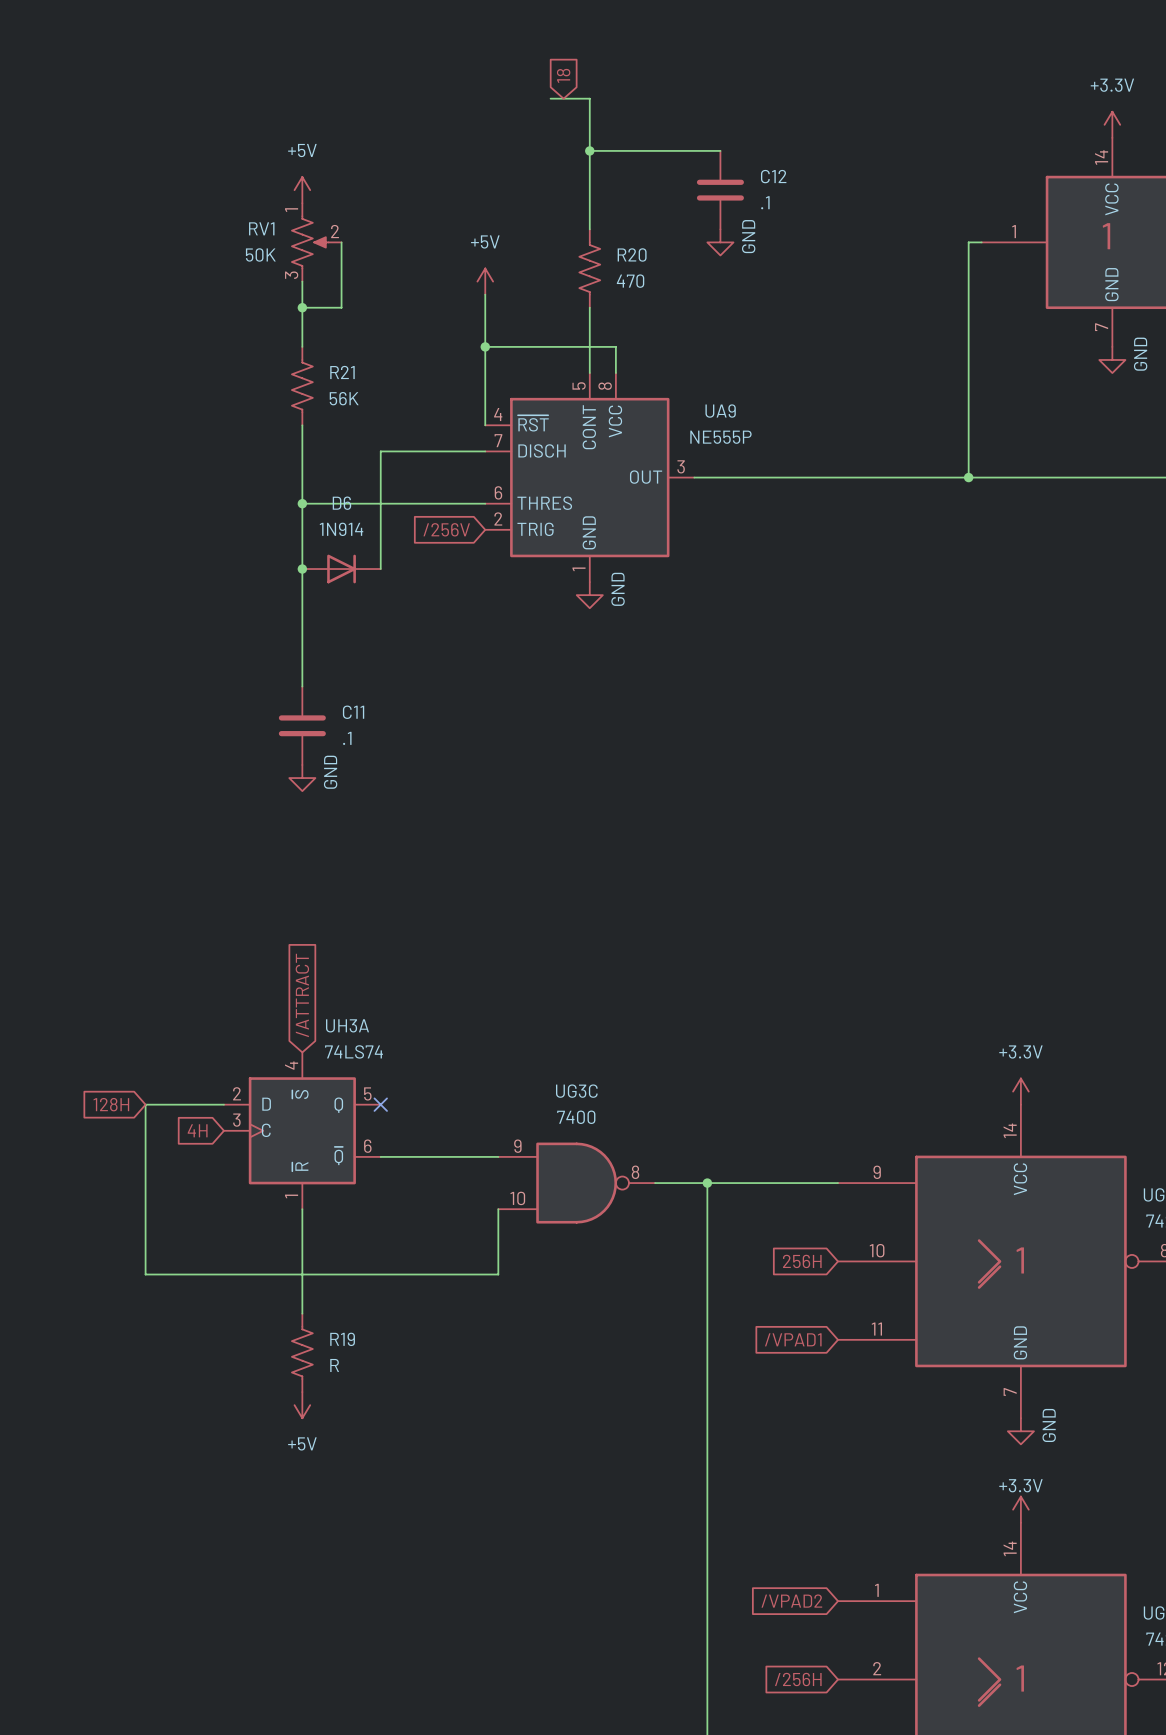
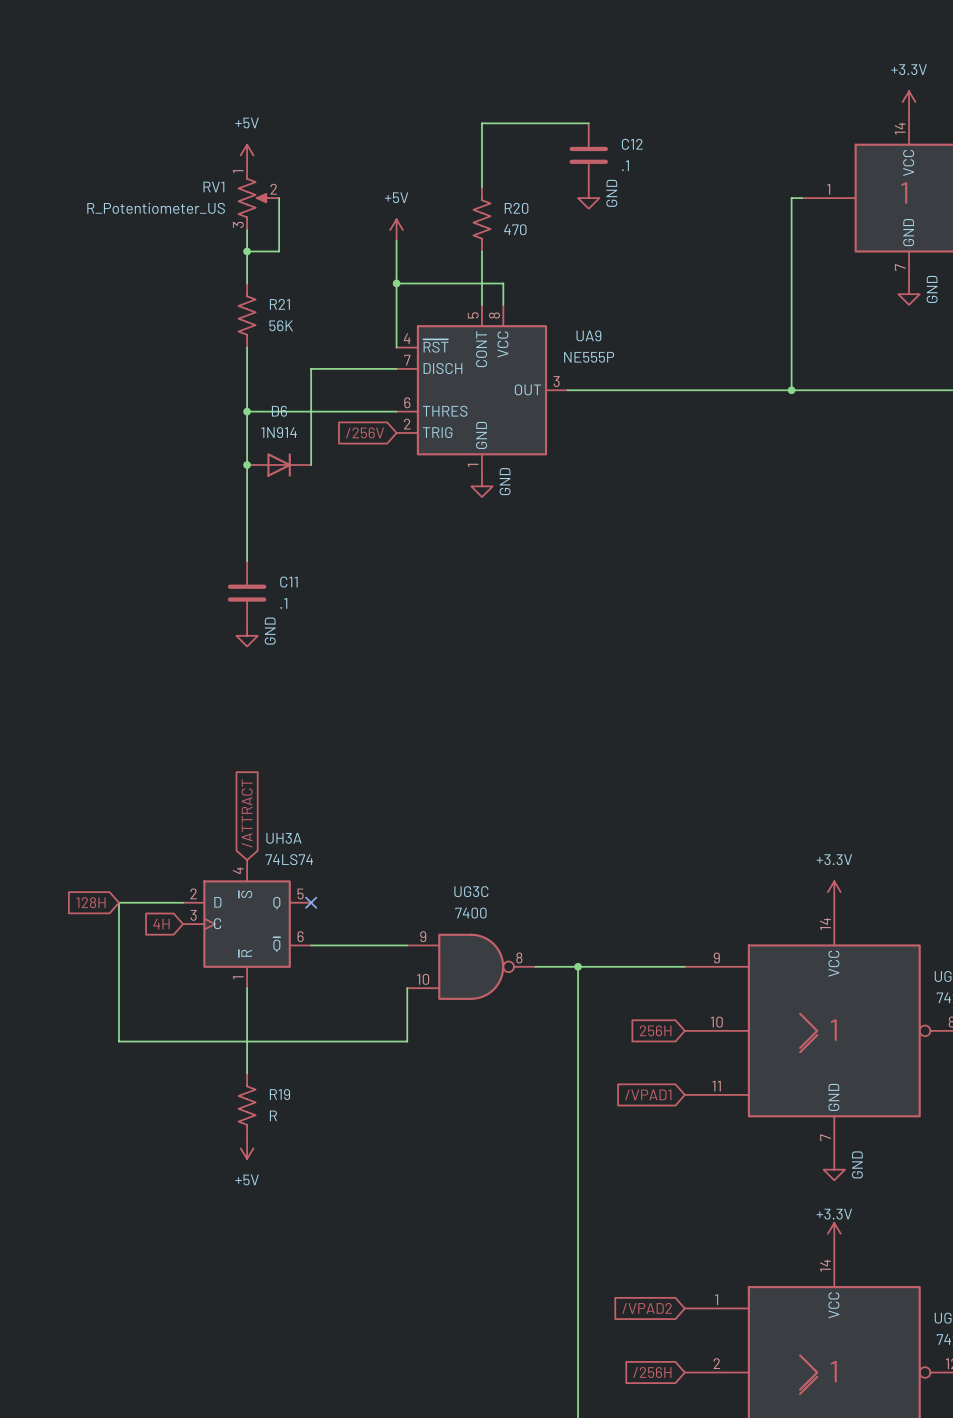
global label: 18 (563, 75) -> none
wire: (550, 98) (589, 98) (589, 150) -> none
junction: (589, 150) -> none
RV1 value: 50K (260, 254) -> R_Potentiometer_US (156, 208)

